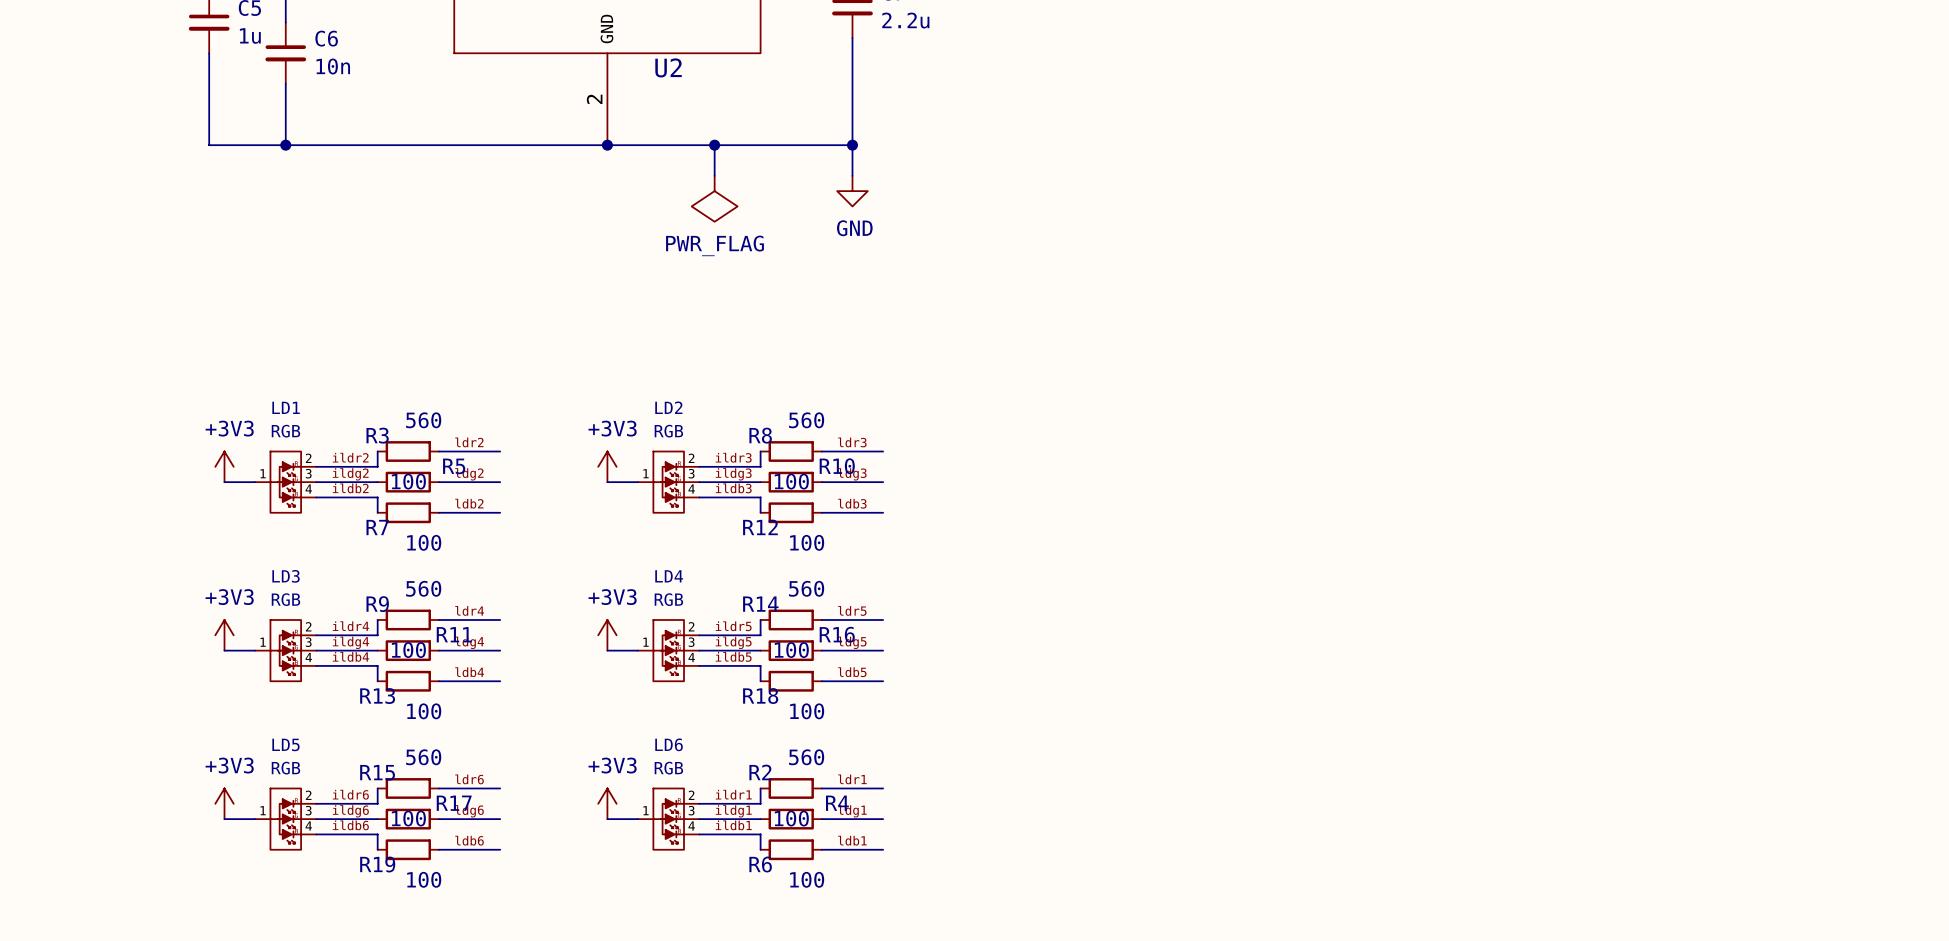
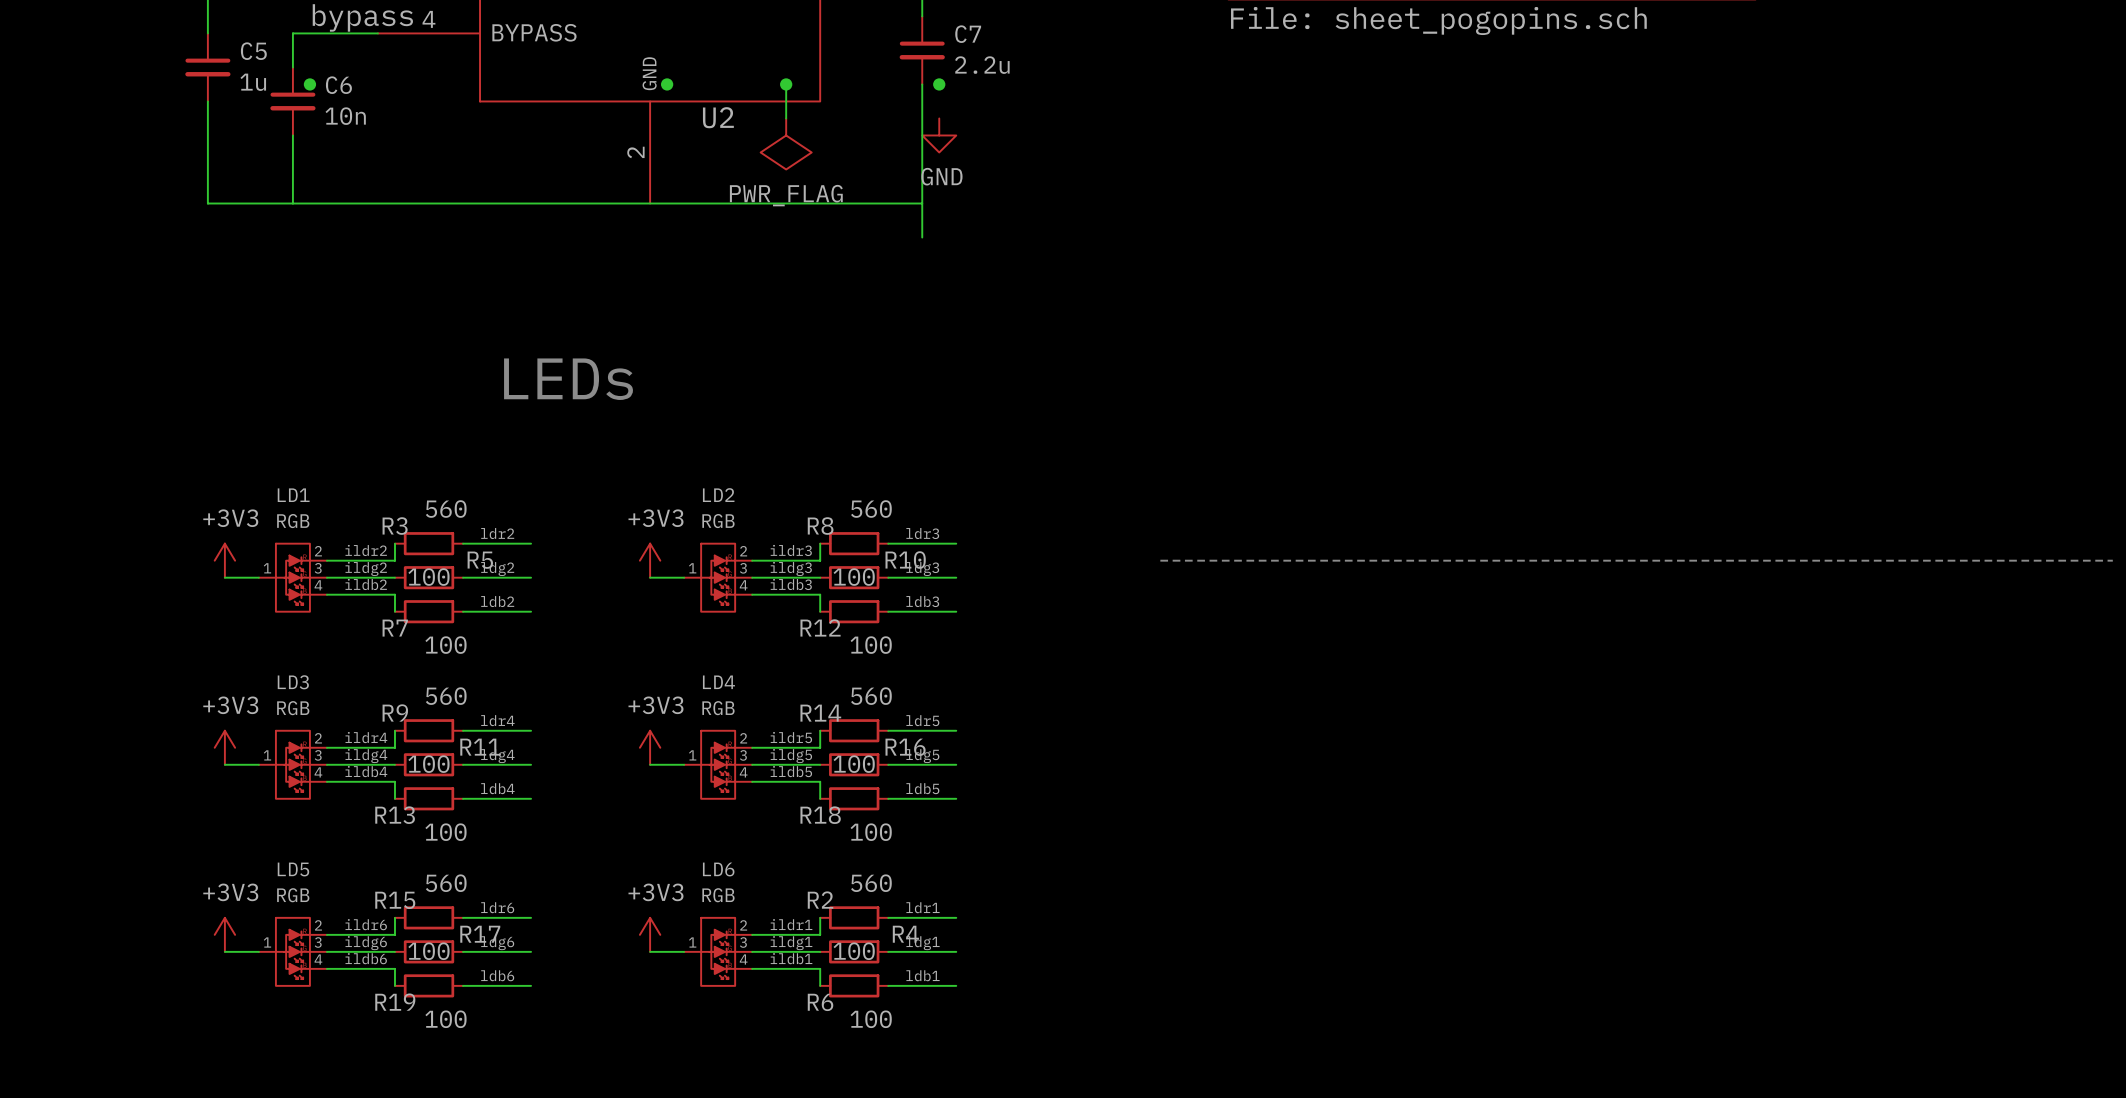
junction: none -> (309, 84)
junction: none -> (667, 84)
junction: none -> (786, 84)
junction: none -> (939, 84)
junction: (285, 145) -> none
junction: (607, 145) -> none
wire: (714, 145) (714, 175) -> (786, 84) (786, 118)
junction: (714, 145) -> none
junction: (852, 145) -> none
power symbol position: GND (852, 191) -> GND (939, 135)
power symbol position: PWR_FLAG (714, 198) -> PWR_FLAG (786, 143)
text: none -> LEDs (568, 379)
line: none -> (1160, 560) (2112, 560)

